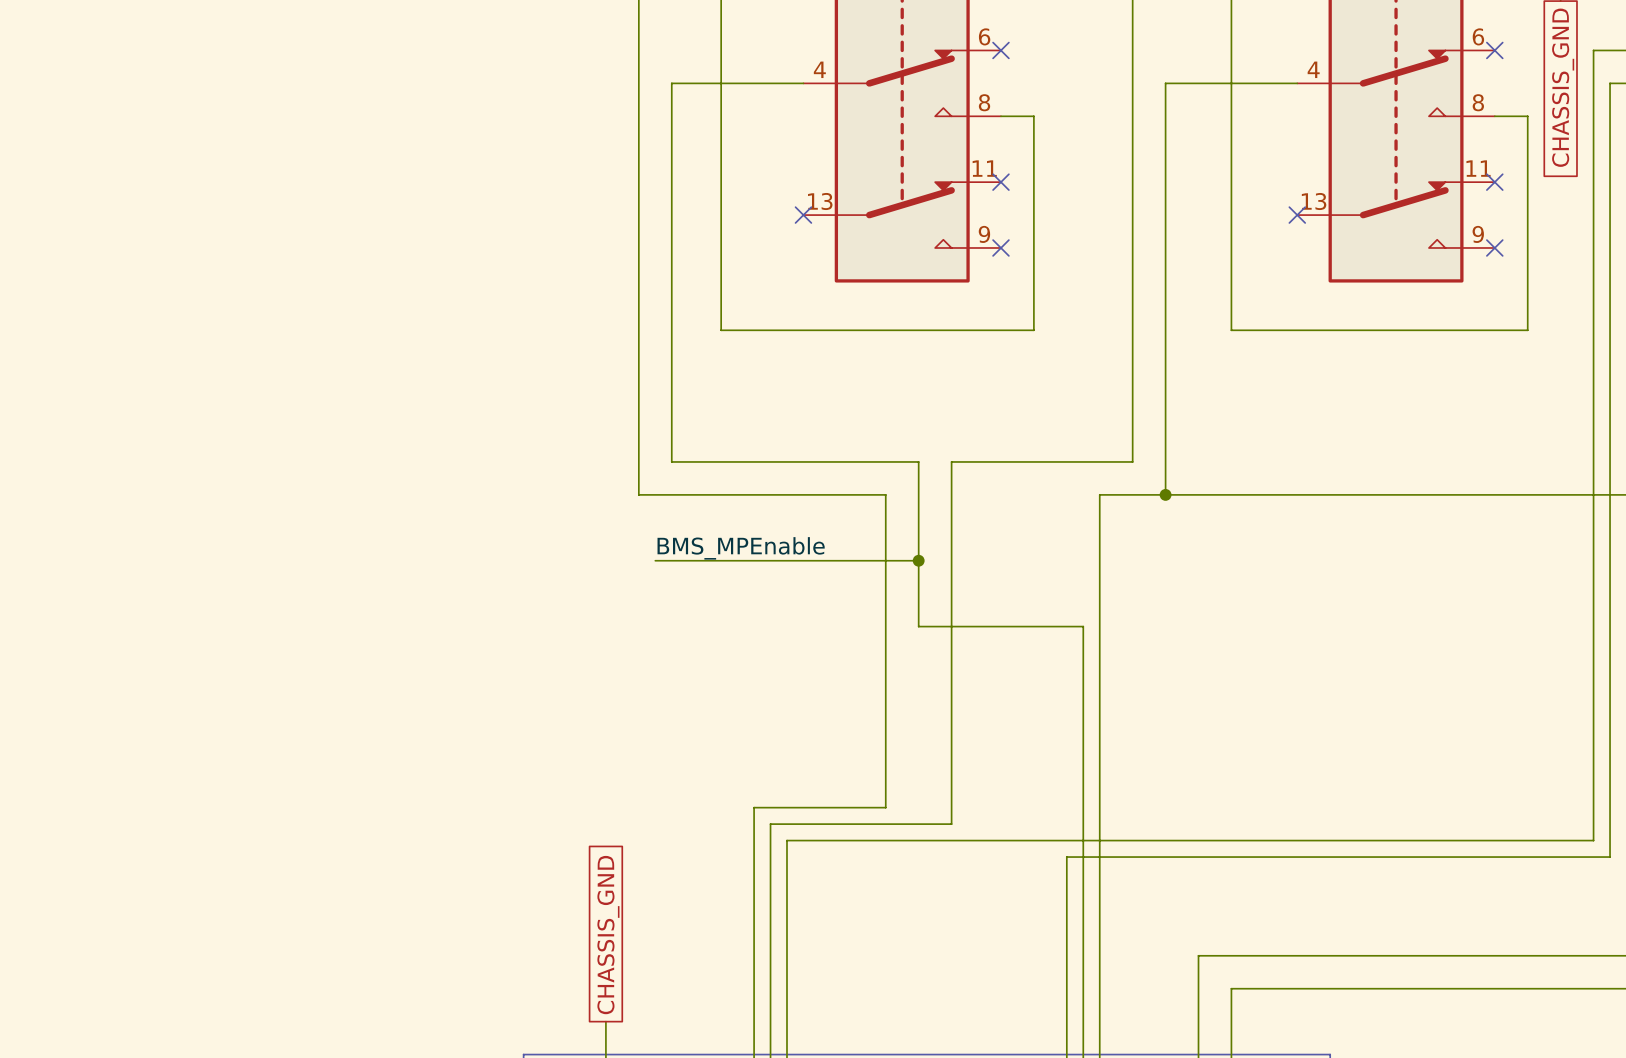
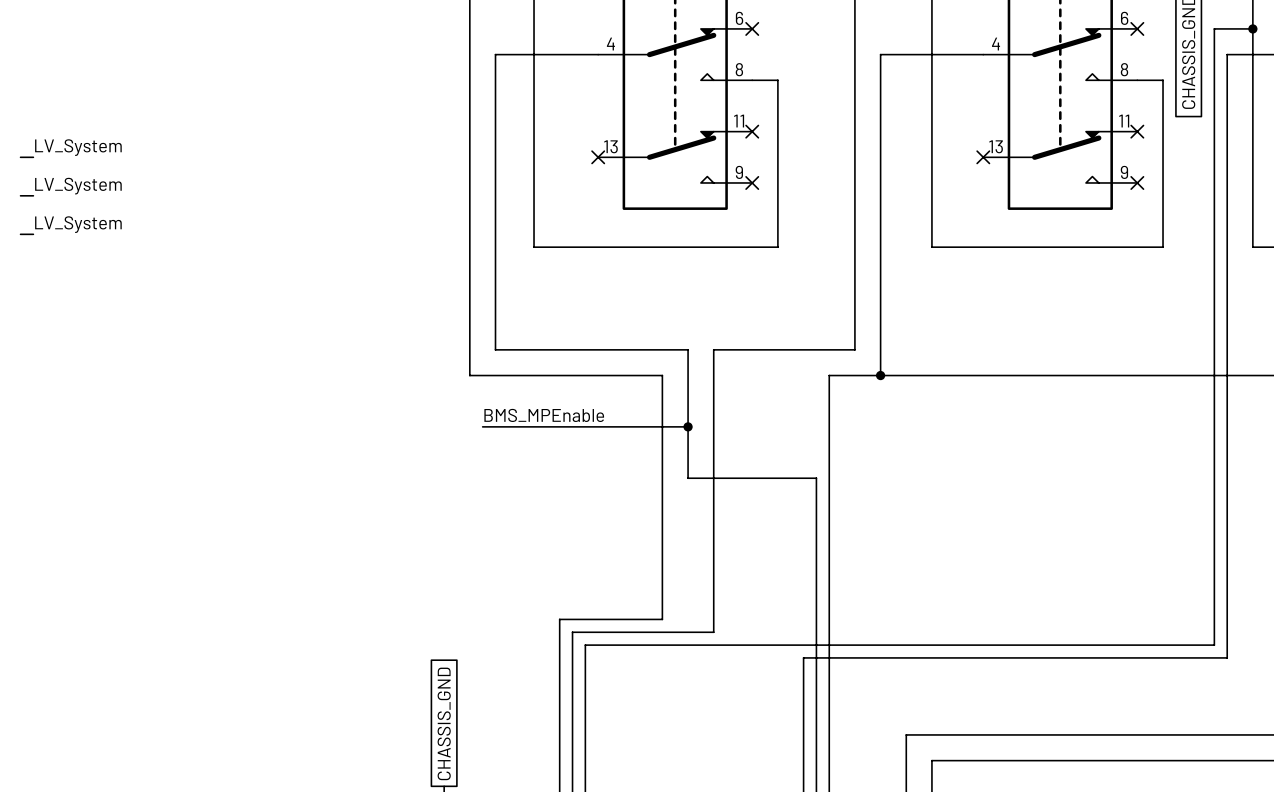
label: none -> LV_System (78, 147)
wire: none -> (20, 157) (33, 157)
label: none -> LV_System (78, 186)
wire: none -> (20, 195) (33, 195)
label: none -> LV_System (78, 224)
wire: none -> (20, 234) (33, 234)

